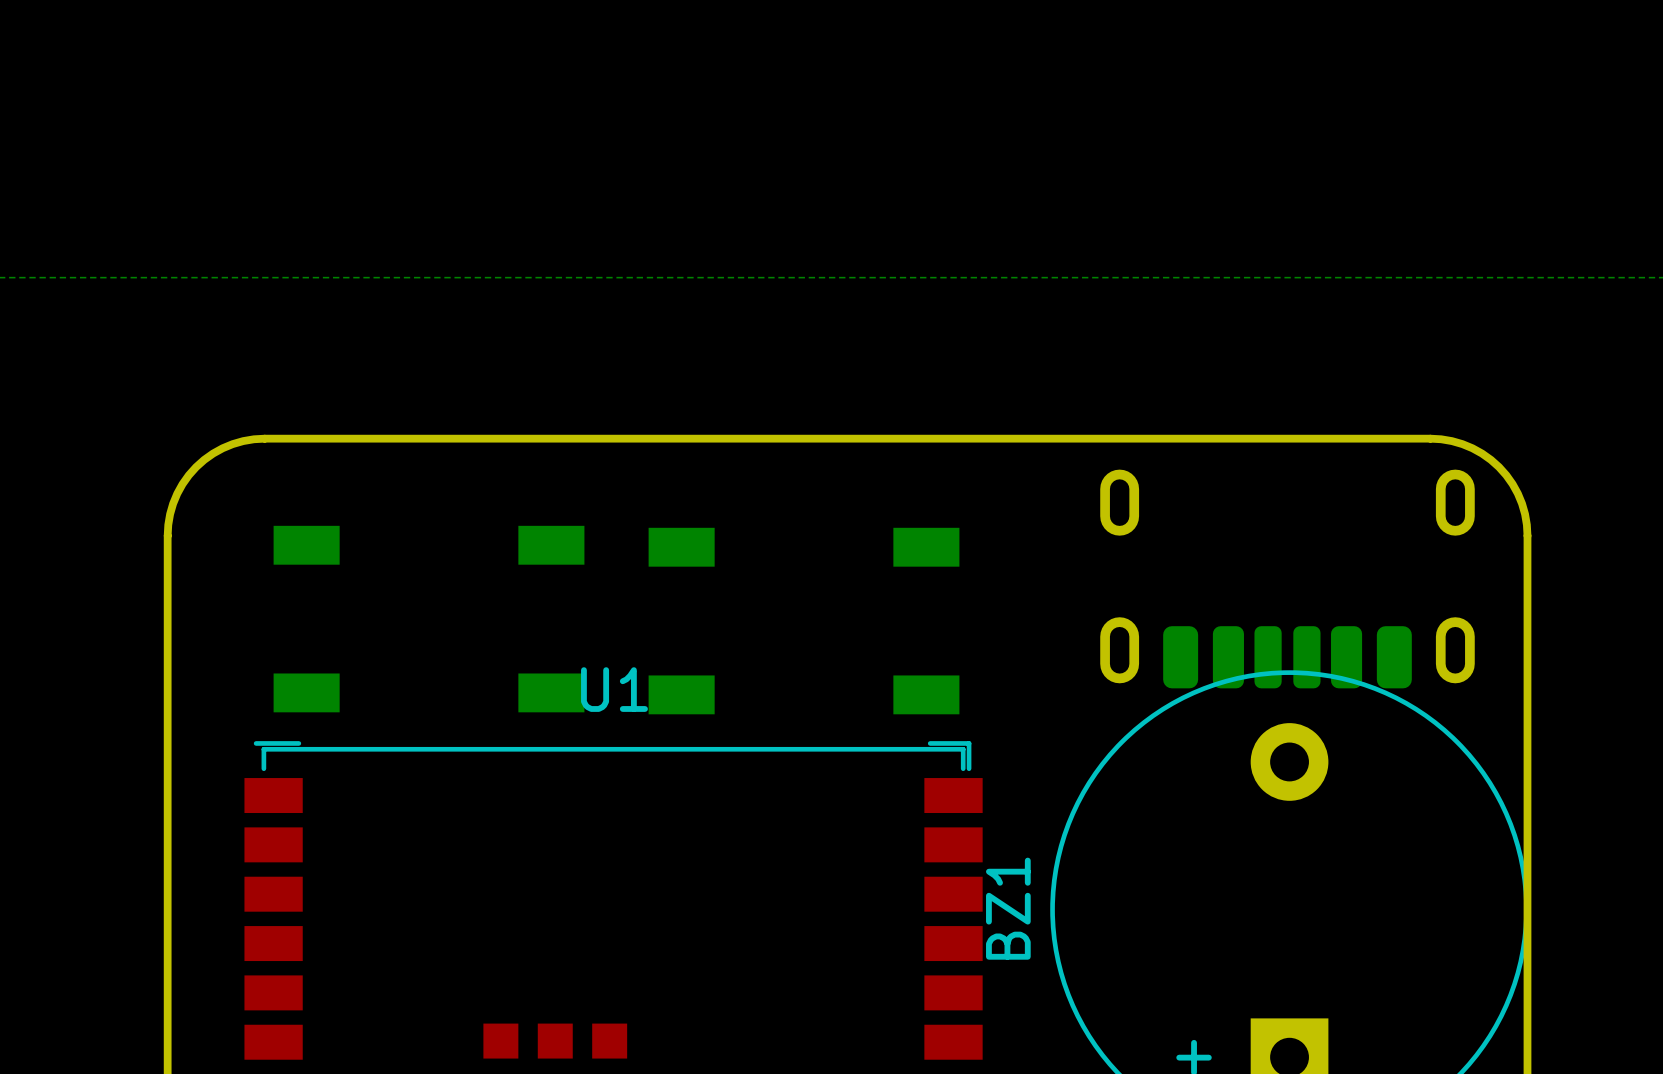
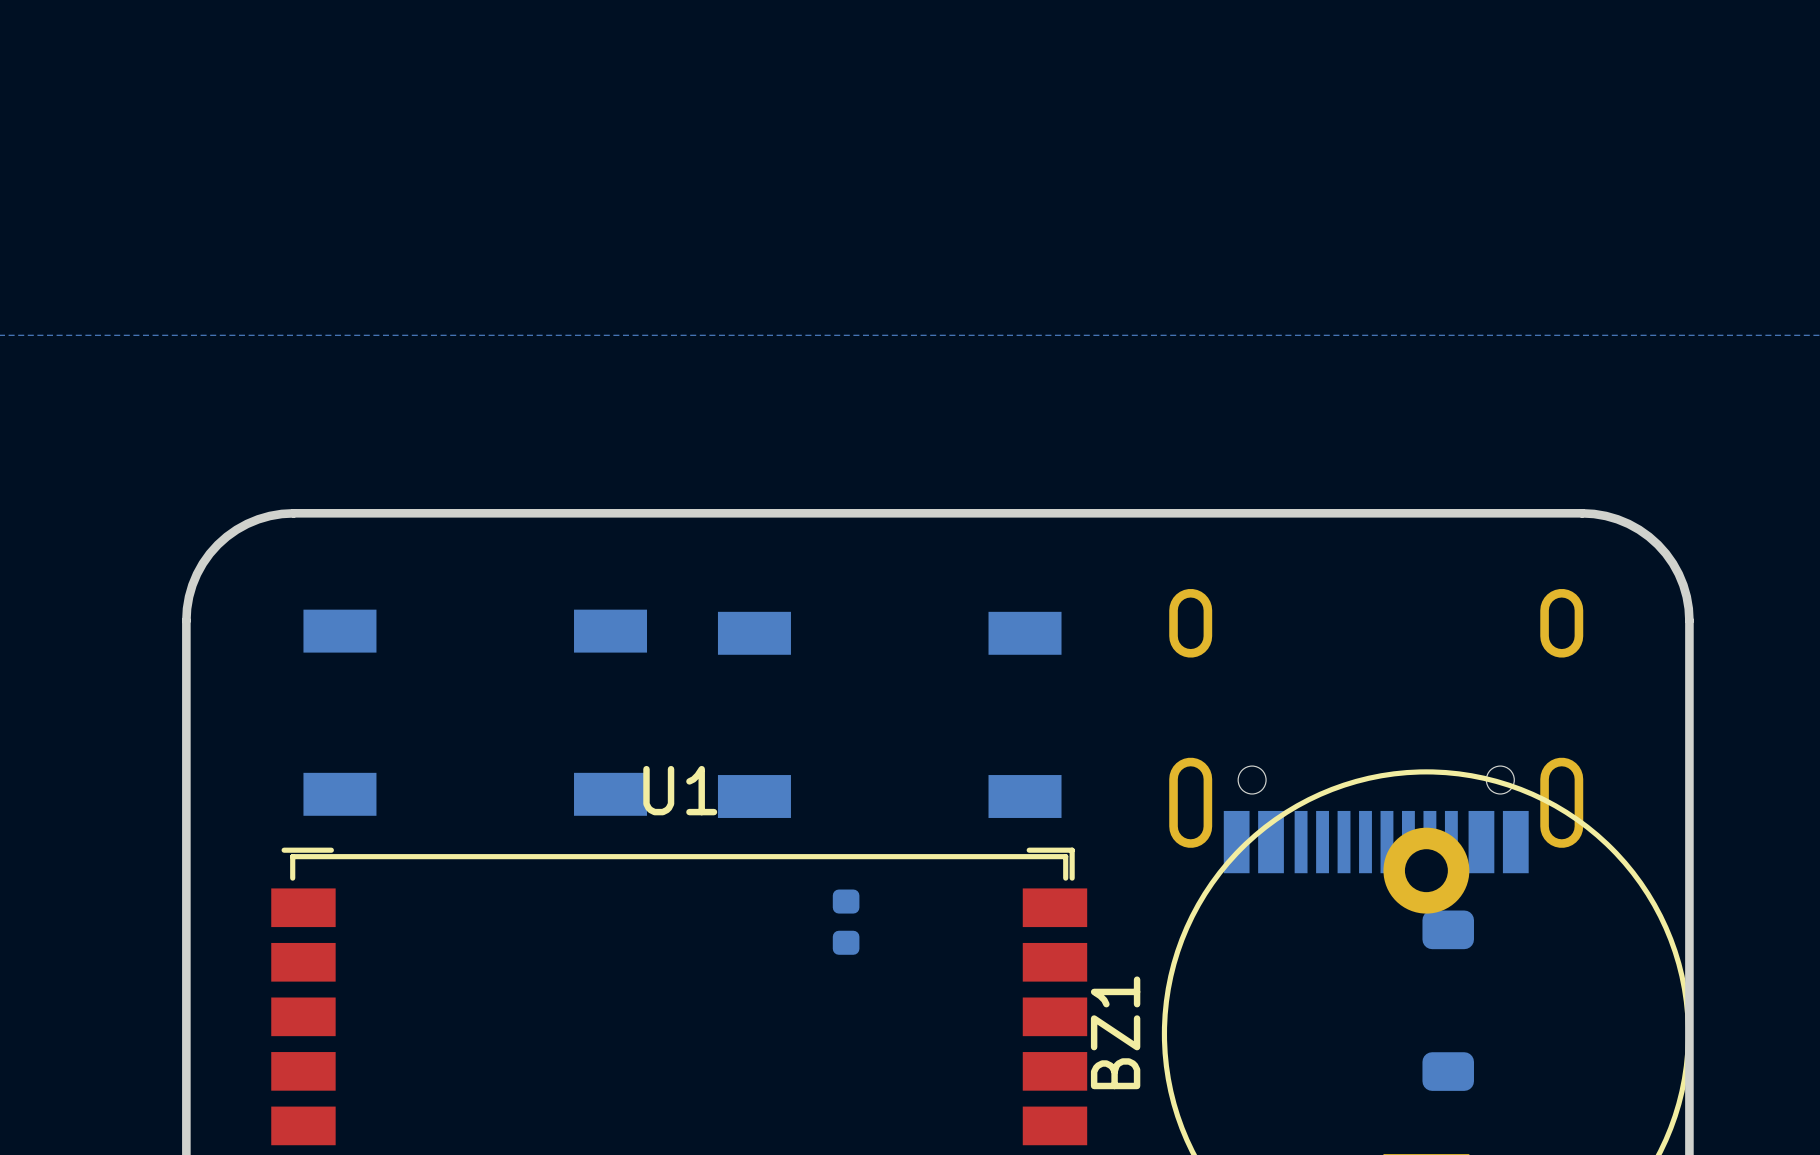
part: (1287, 578) -> none
part: none -> (1376, 731)
part: none -> (846, 922)
part: none -> (1448, 1000)

